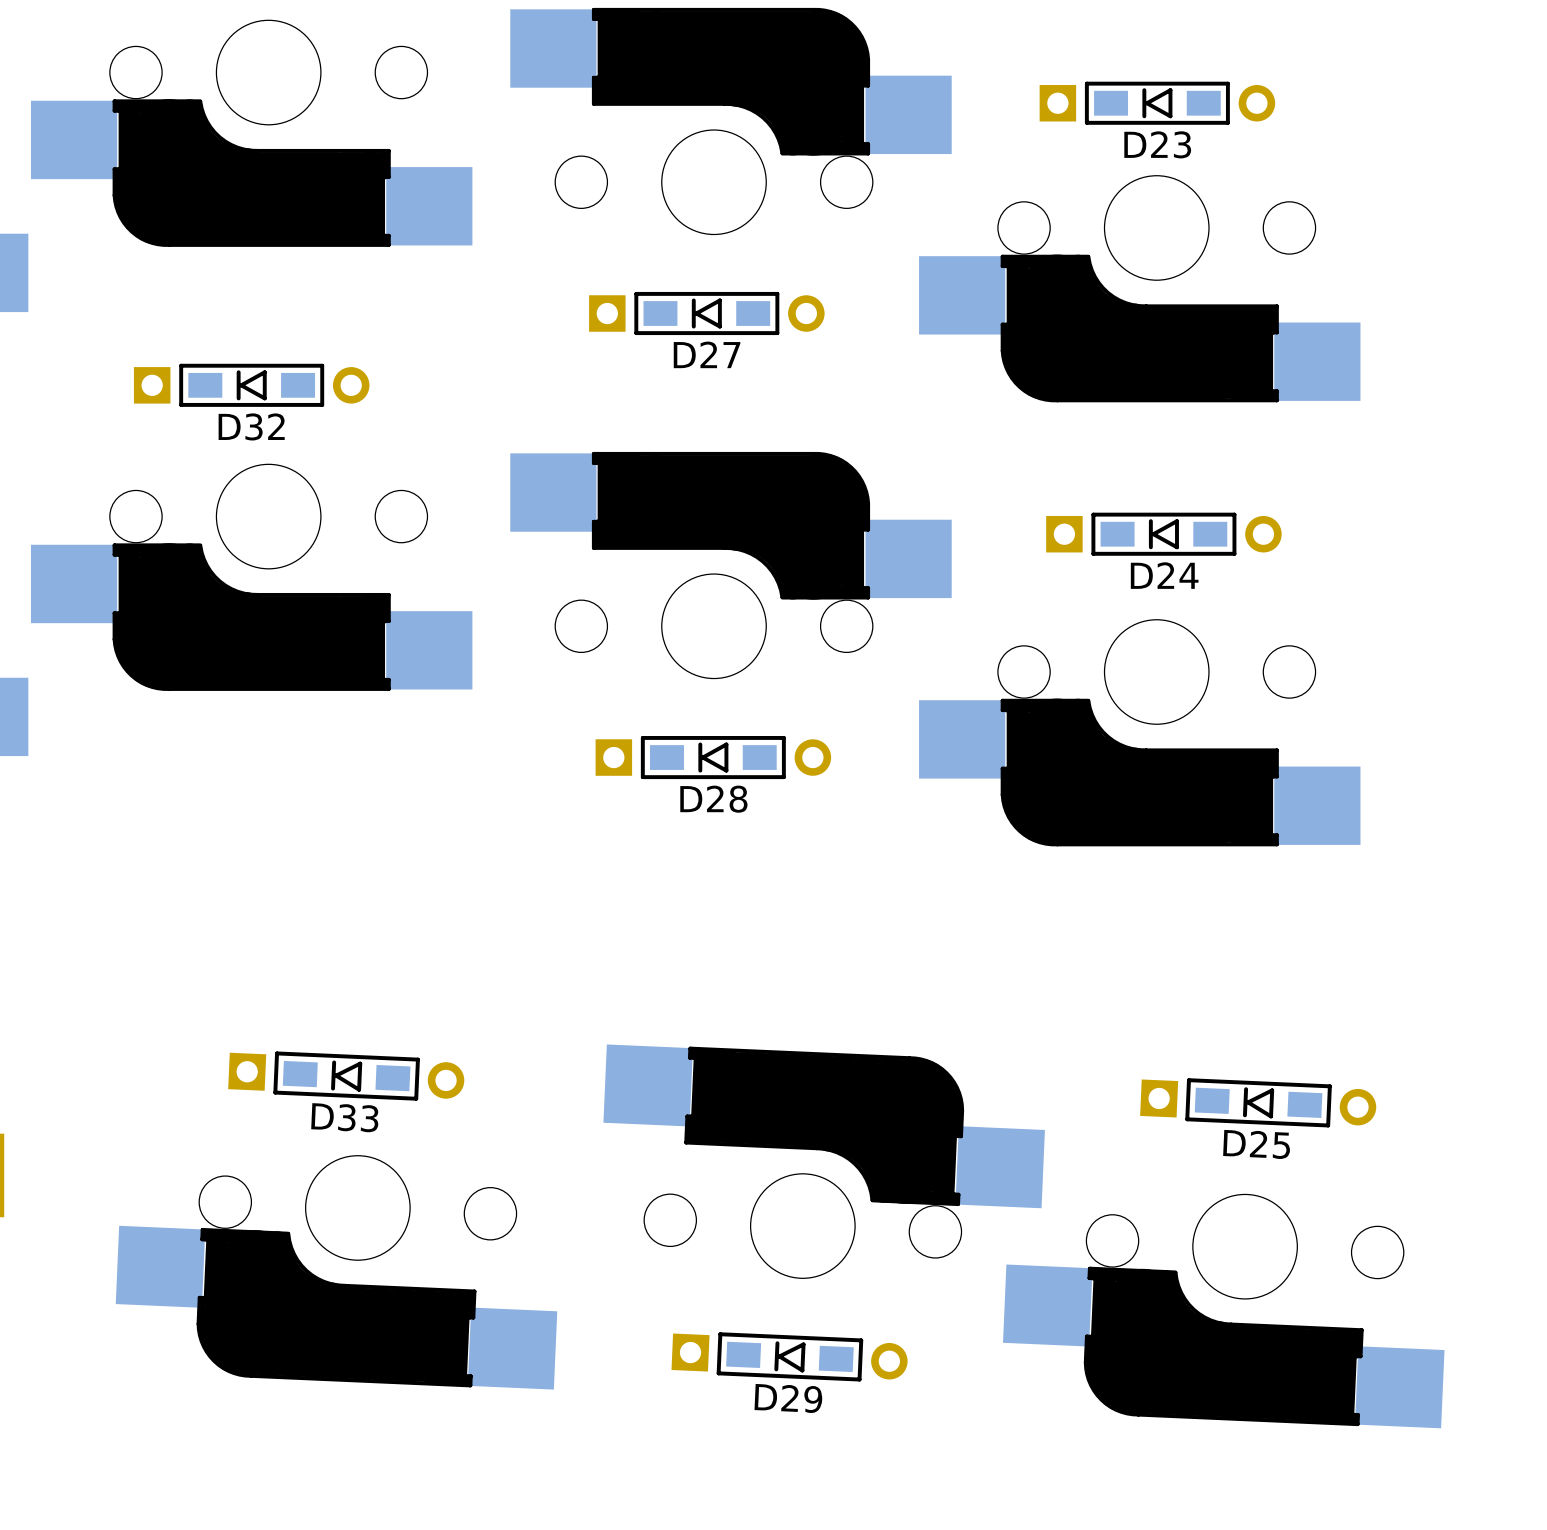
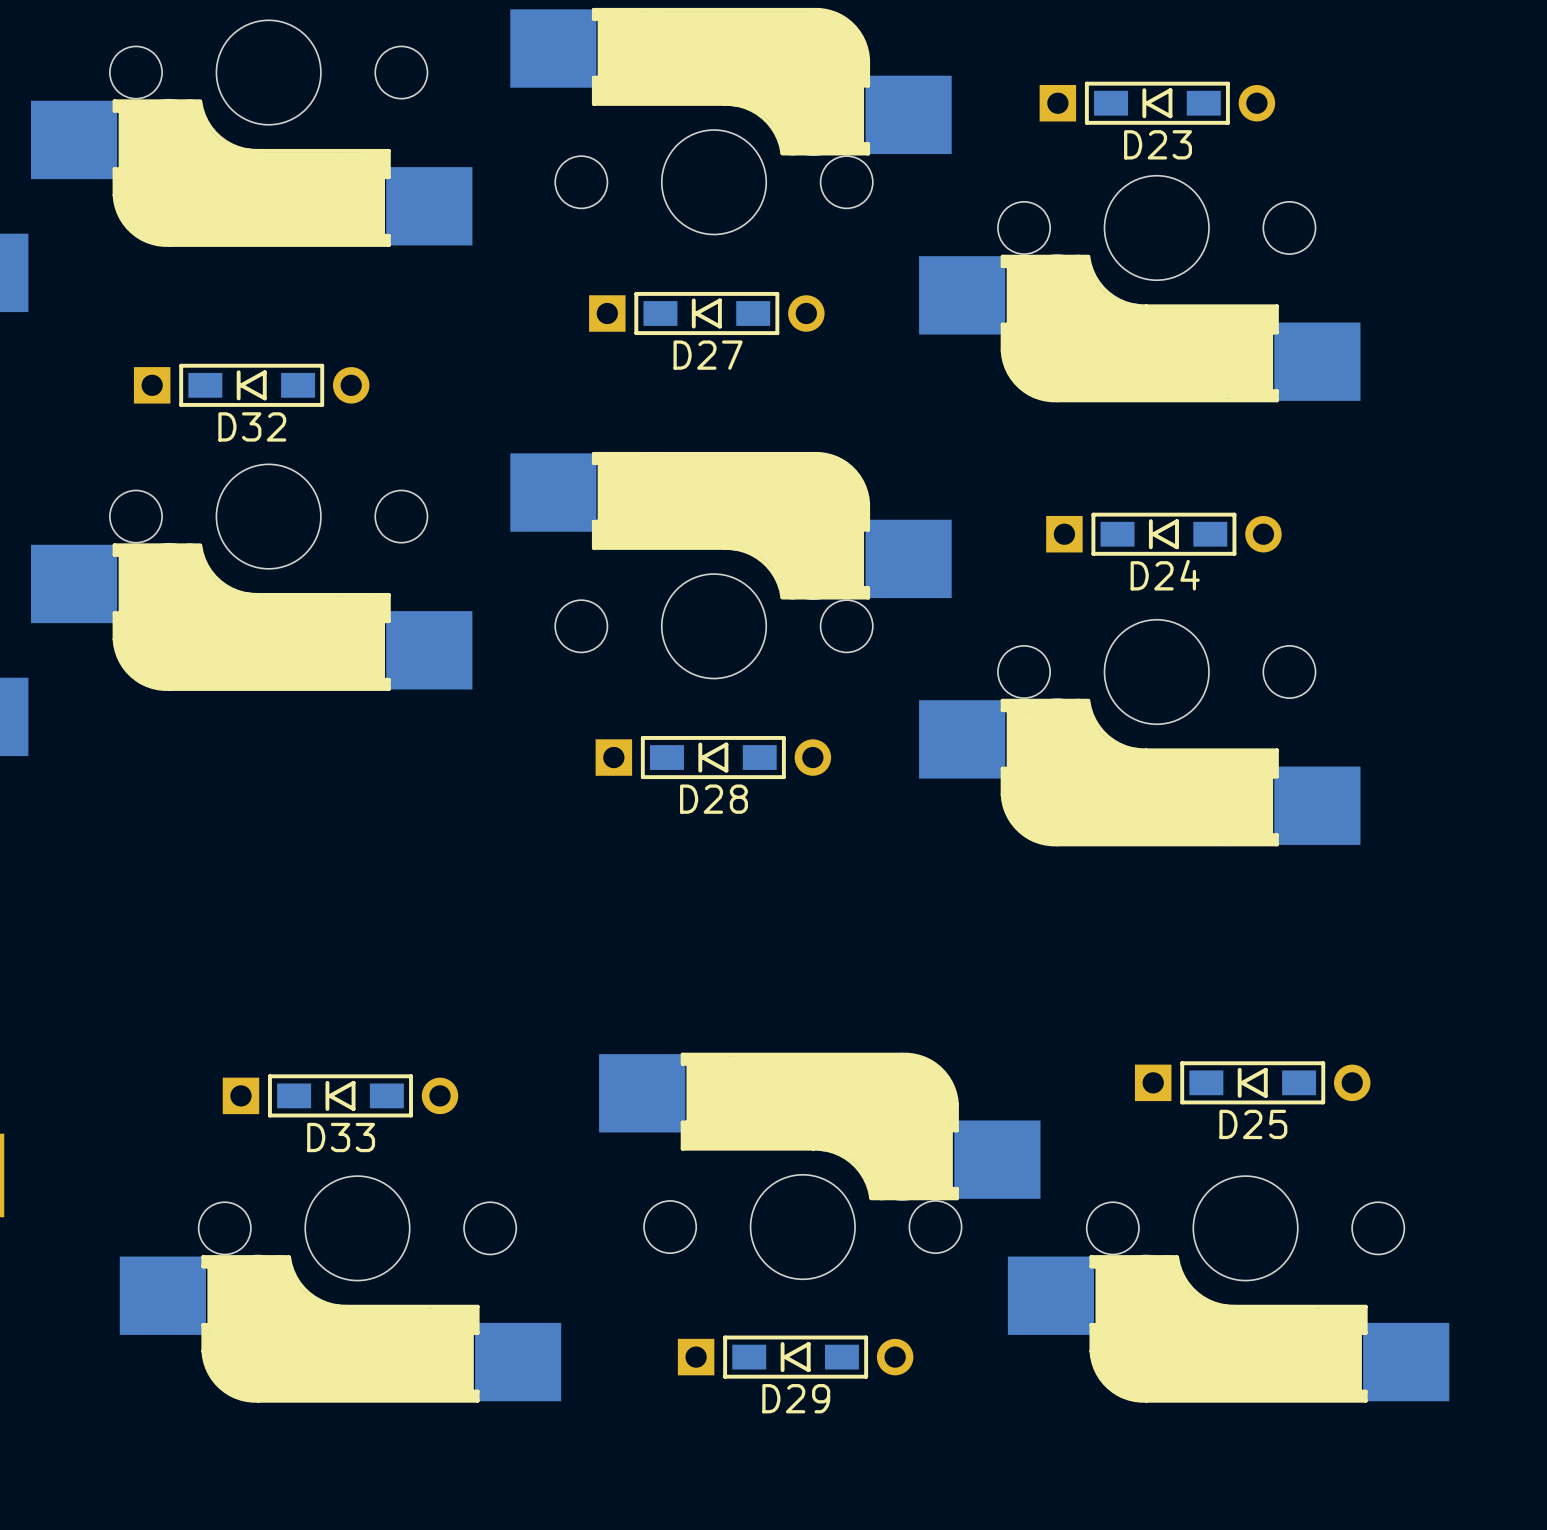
D33 rotation: 0° (346, 1076) -> 2.5° counterclockwise (340, 1095)
D25 rotation: 0° (1258, 1102) -> 2.5° counterclockwise (1252, 1082)
part rotation: 0° (824, 1161) -> 2.5° counterclockwise (819, 1165)
part rotation: 0° (336, 1272) -> 2.5° counterclockwise (340, 1289)
part rotation: 0° (1223, 1311) -> 2.5° counterclockwise (1228, 1289)
D29 rotation: 0° (789, 1356) -> 2.5° counterclockwise (795, 1357)

